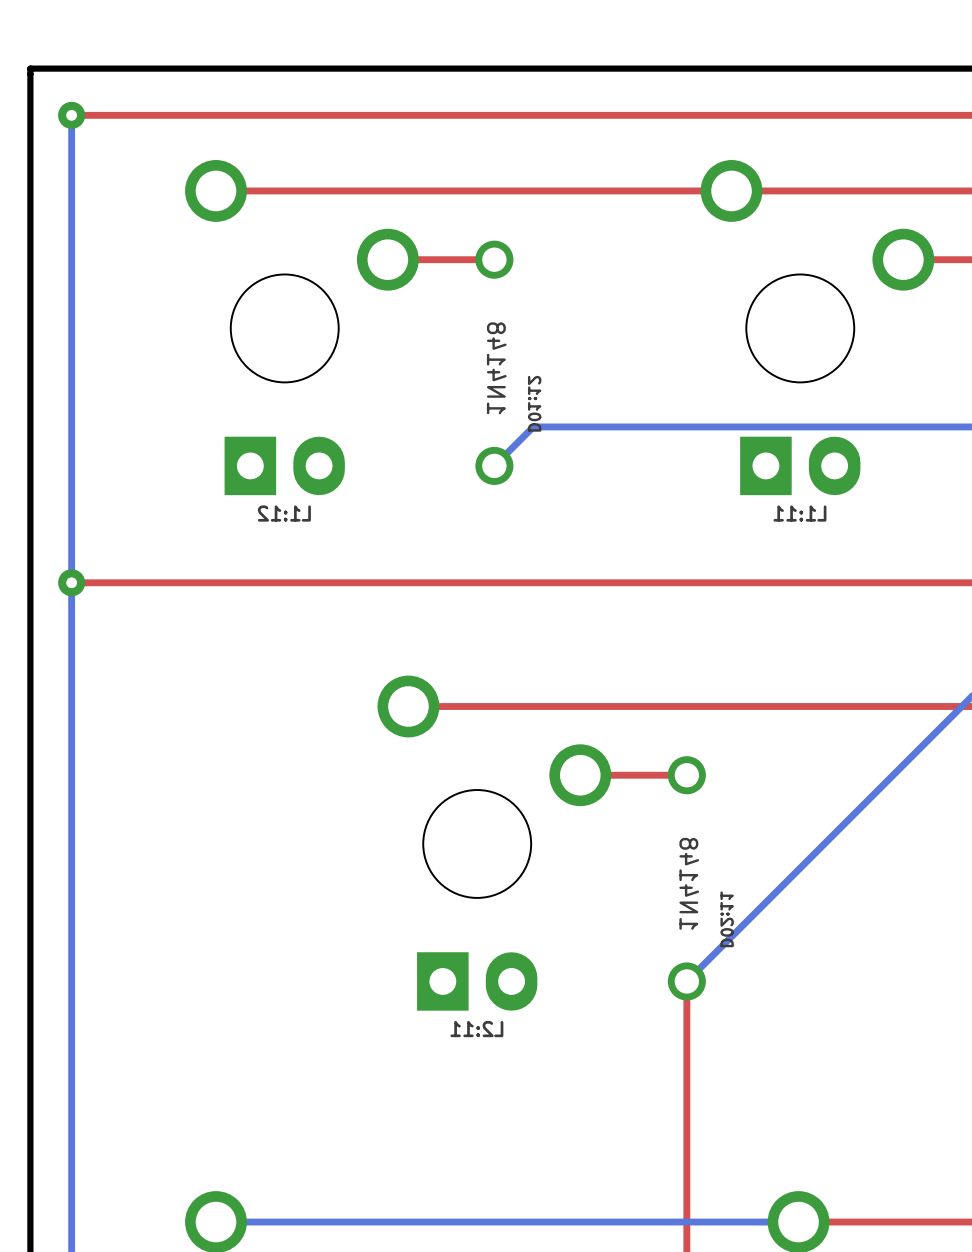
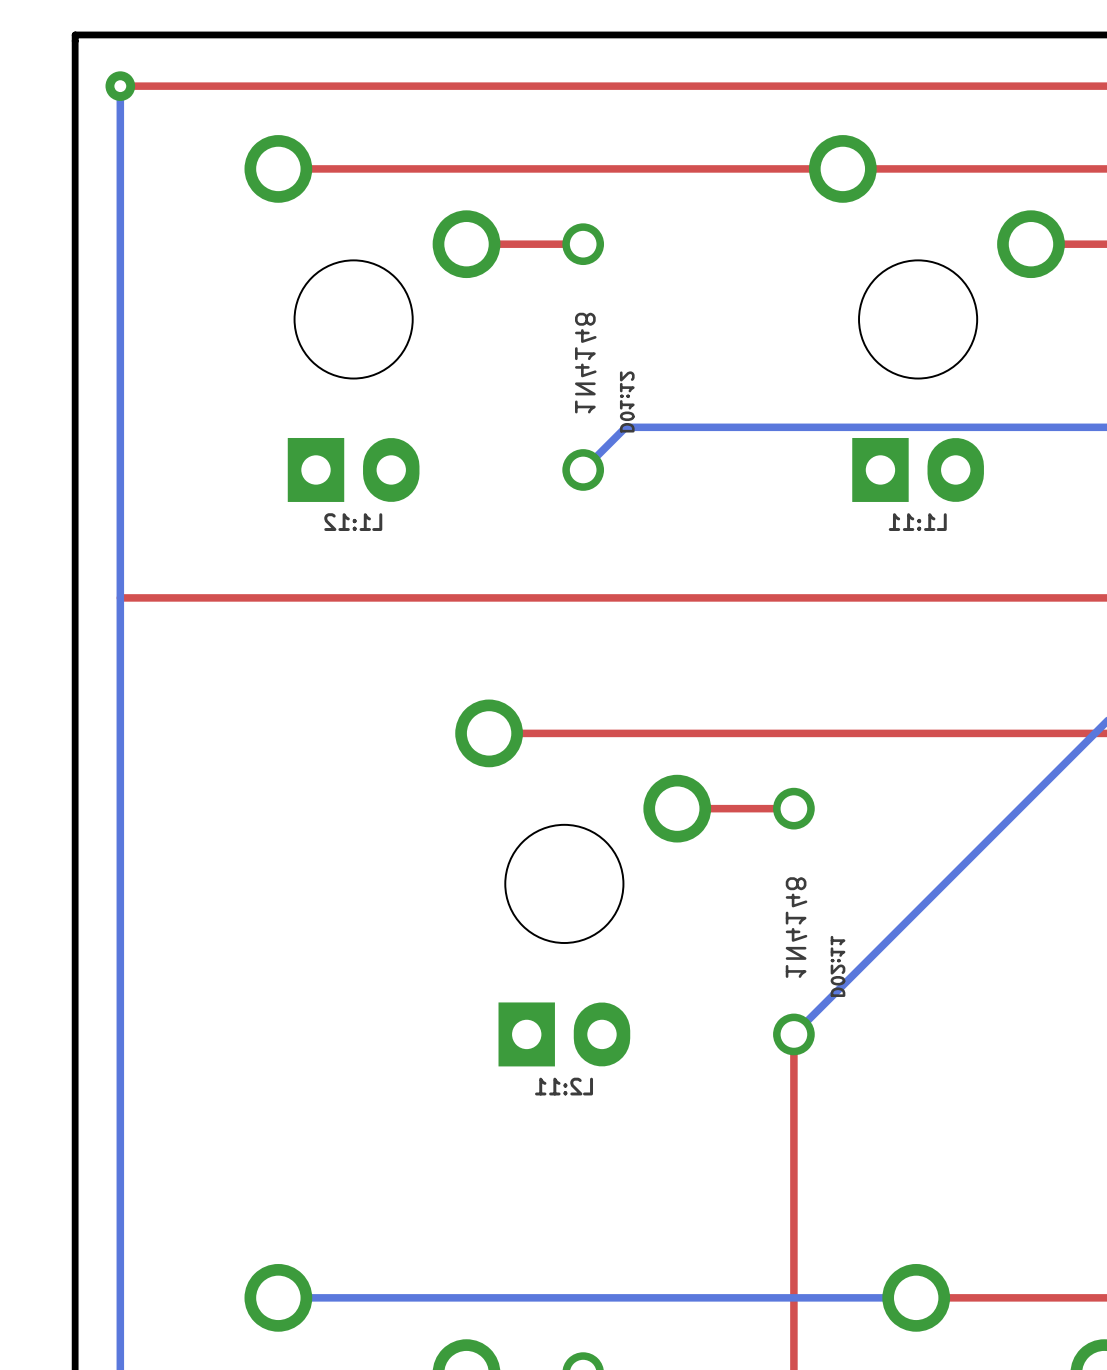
via: (71, 582) -> none

